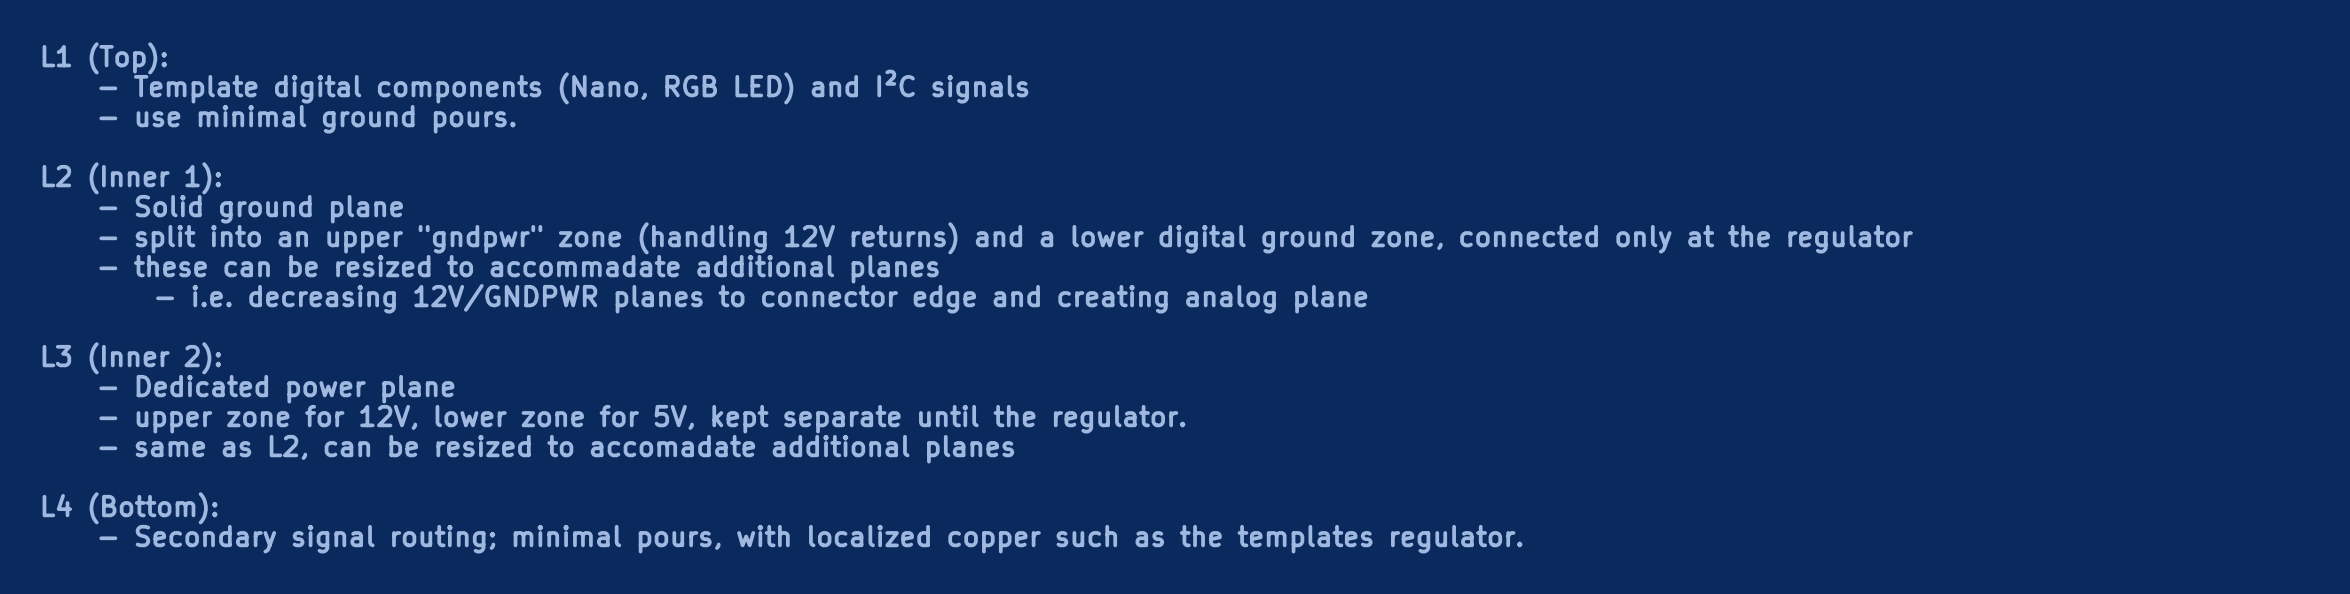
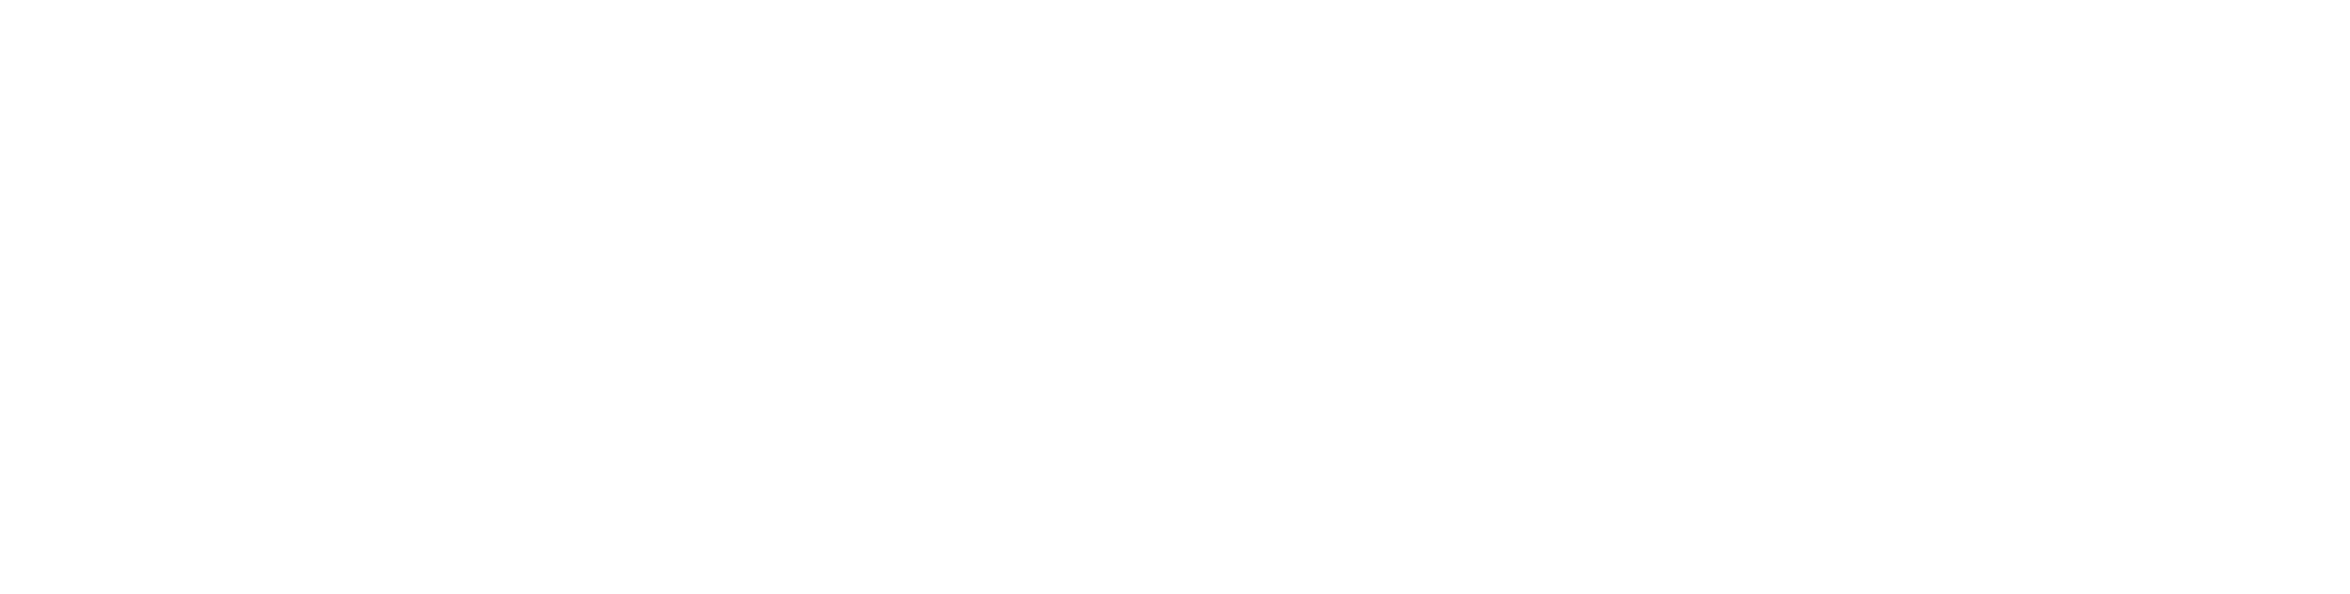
text: L1 (Top): (104, 58) -> none
text: - Template digital components (Nano, RGB LED) and I²C signals (563, 87) -> none
text: - use minimal ground pours. (307, 119) -> none
text: L2 (Inner 1): (131, 178) -> none
text: - Solid ground plane (251, 209) -> none
text: - split into an upper "gndpwr" zone (handling 12V returns) and a lower digital ground zone, connected only at the regulator (1006, 238) -> none
text: - these can be resized to accommadate additional planes (519, 269) -> none
text: - i.e. decreasing 12V/GNDPWR planes to connector edge and creating analog plane (761, 298) -> none
text: L3 (Inner 2): (131, 358) -> none
text: - Dedicated power plane (276, 389) -> none
text: - upper zone for 12V, lower zone for 5V, kept separate until the regulator. (642, 419) -> none
text: - same as L2, can be resized to accomadate additional planes (556, 449) -> none
text: L4 (Bottom): (130, 508) -> none
text: - Secondary signal routing; minimal pours, with localized copper such as the templates regulator. (810, 539) -> none

